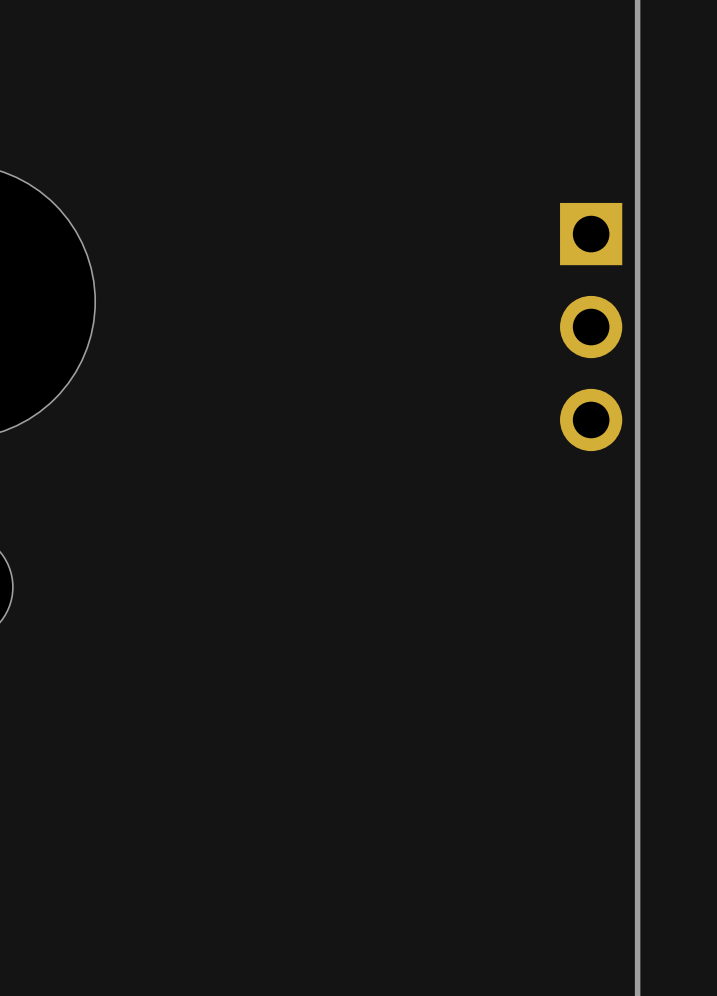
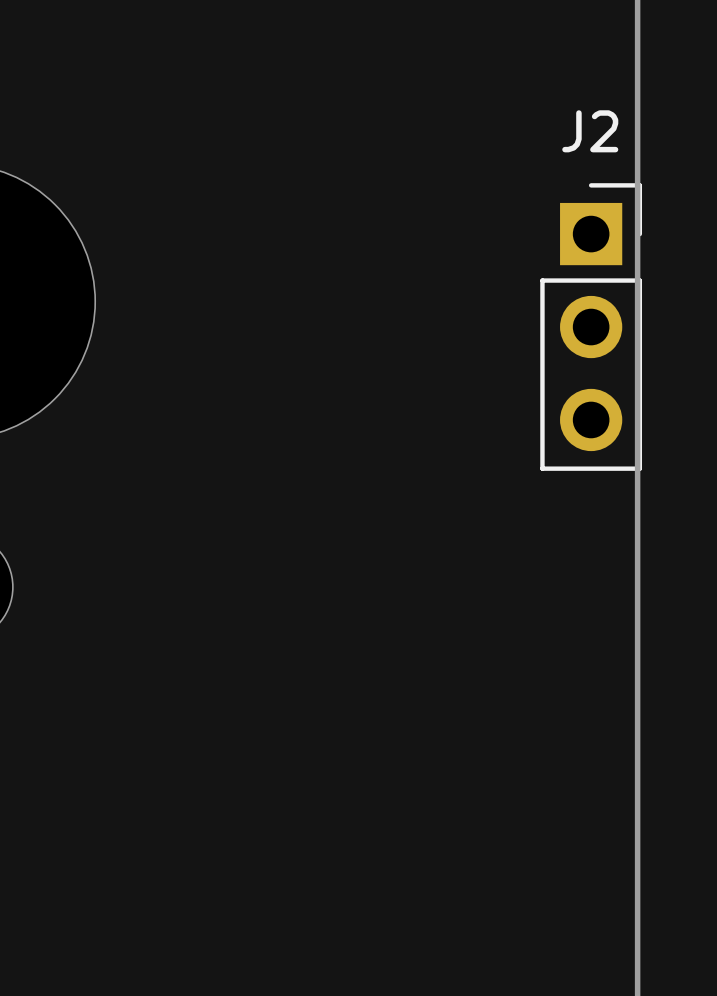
J2 side: bottom (591, 327) -> top (591, 327)

